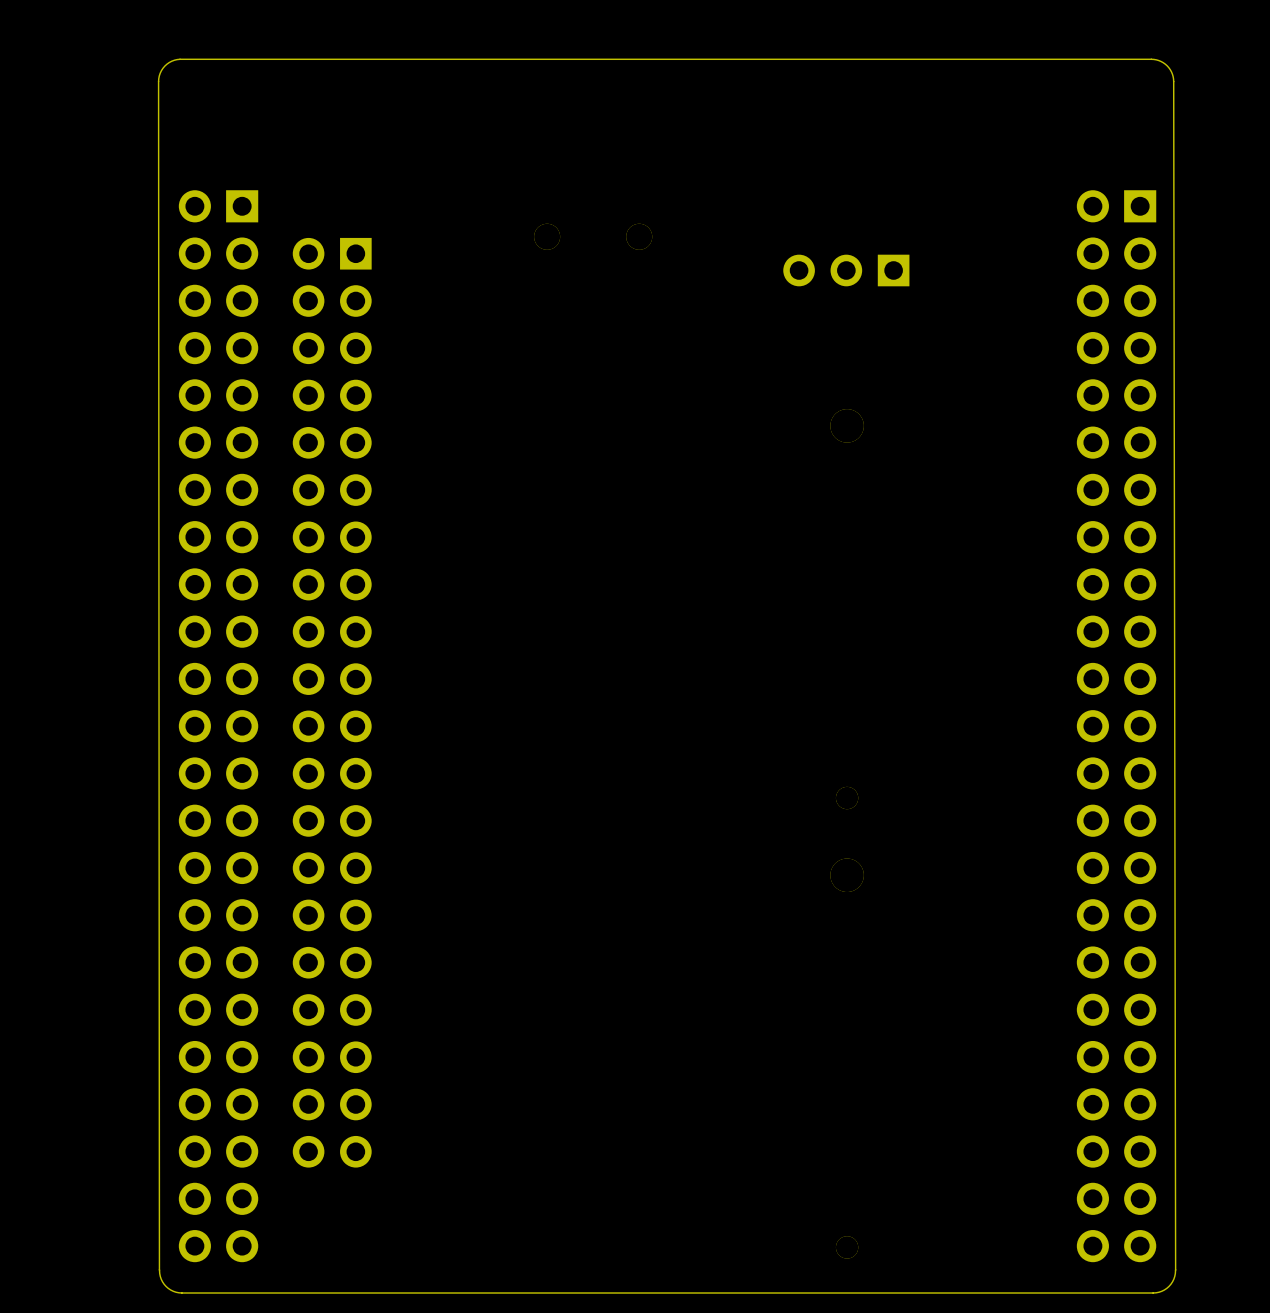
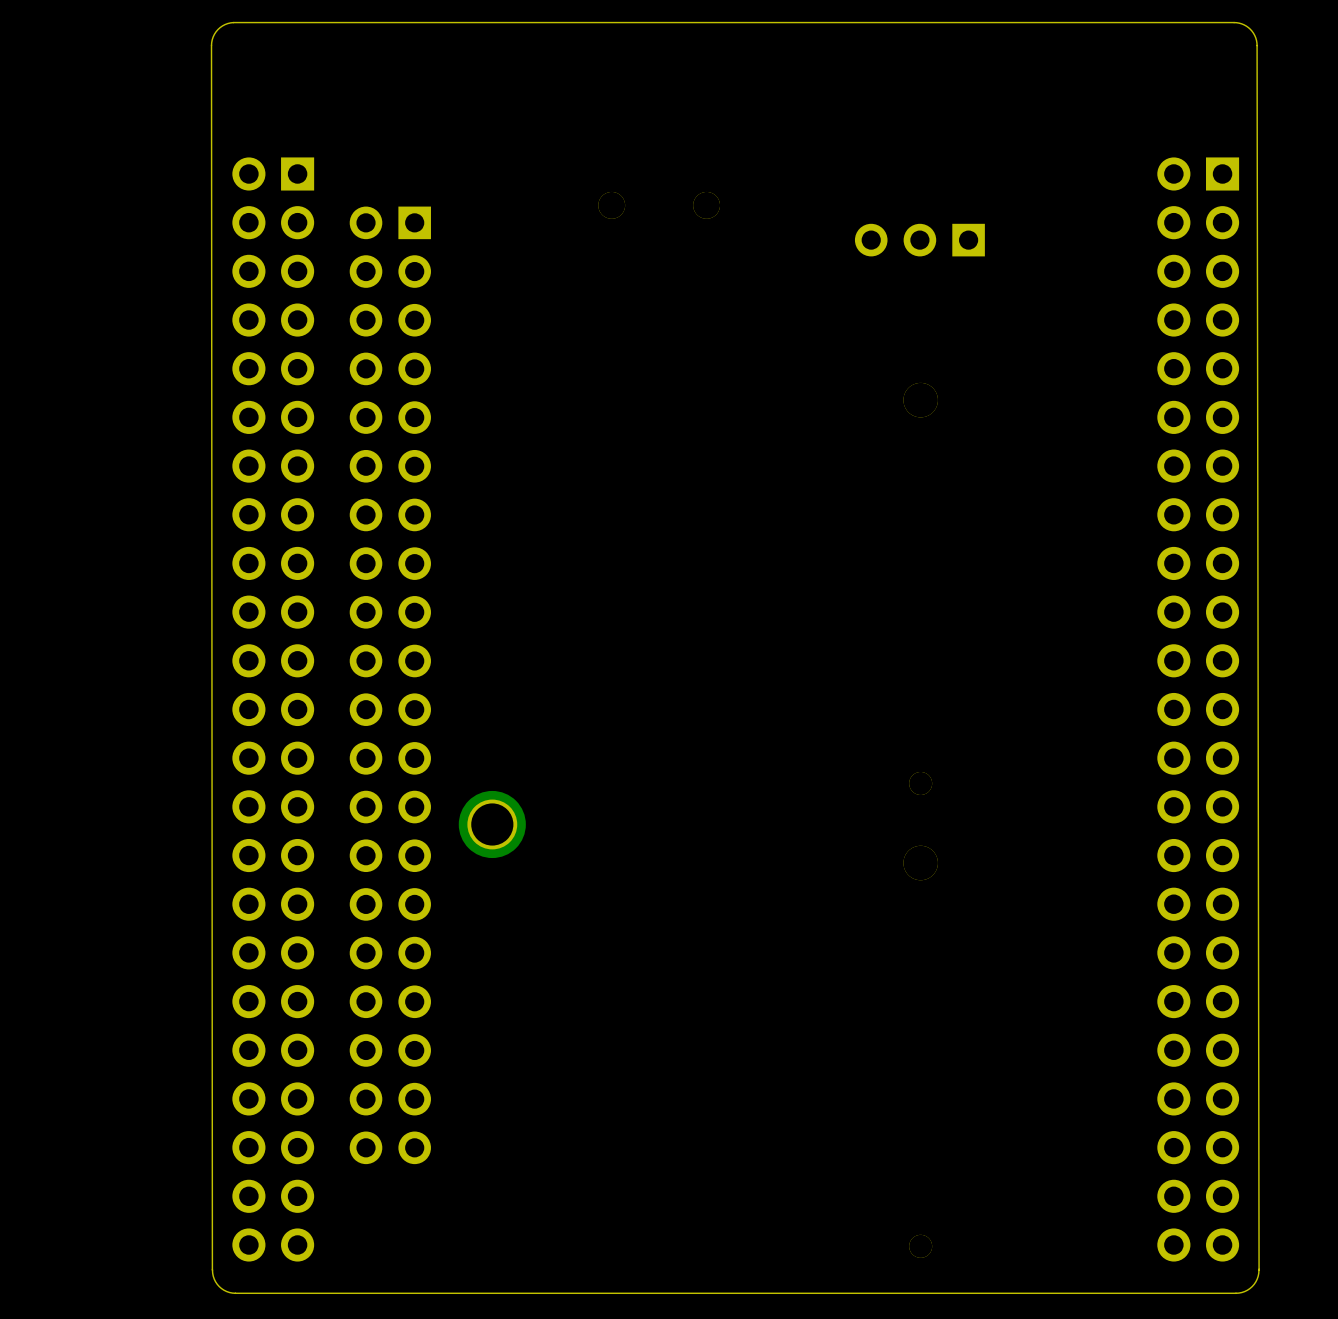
part: none -> (492, 824)

